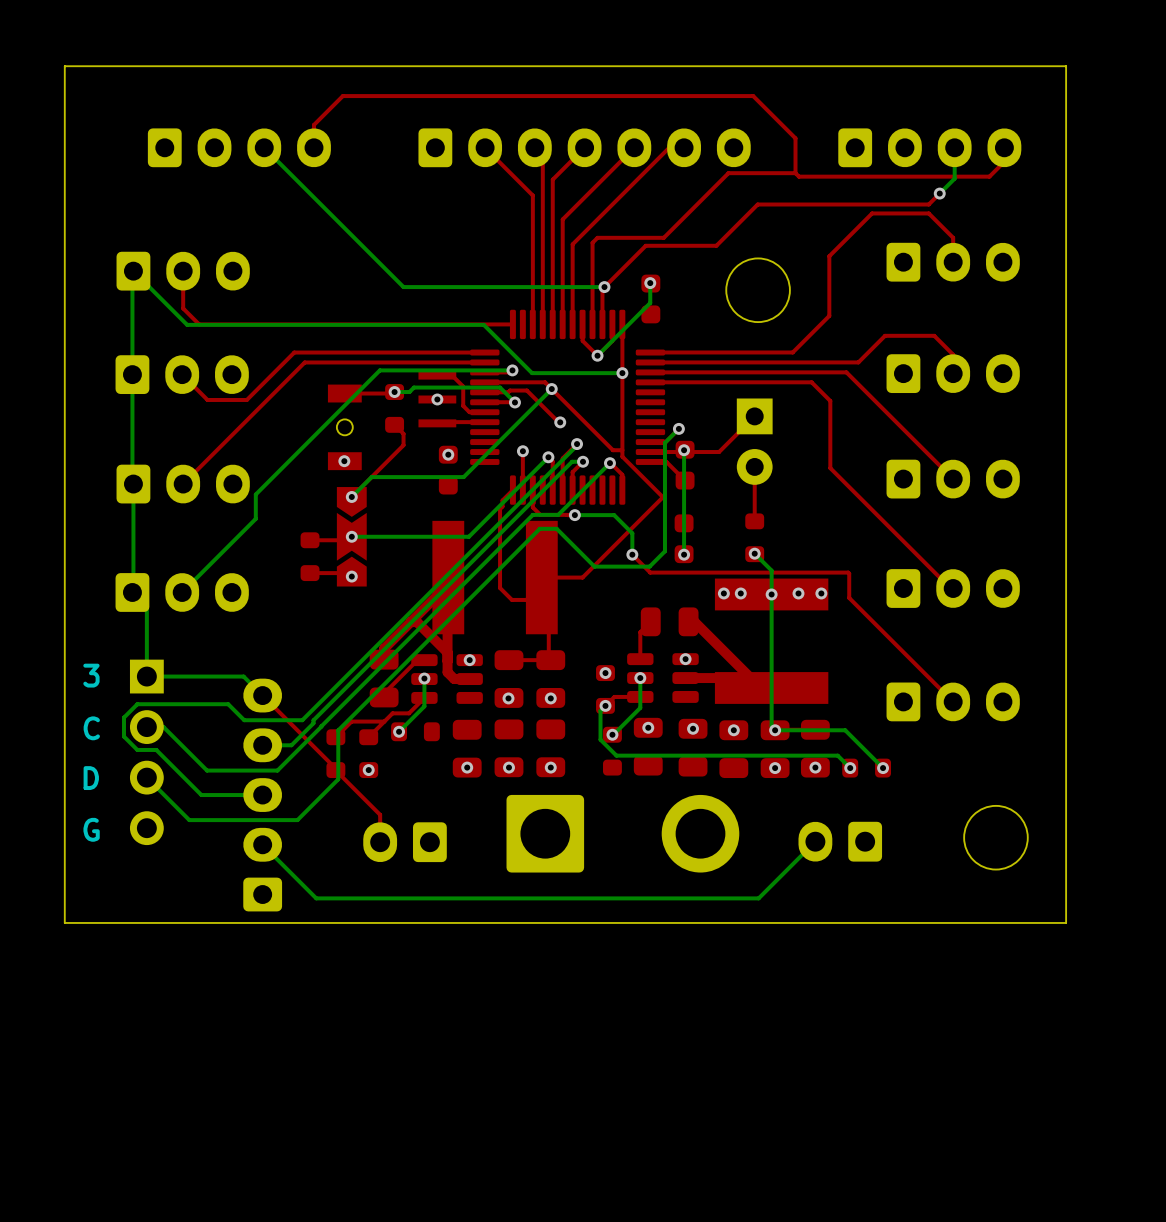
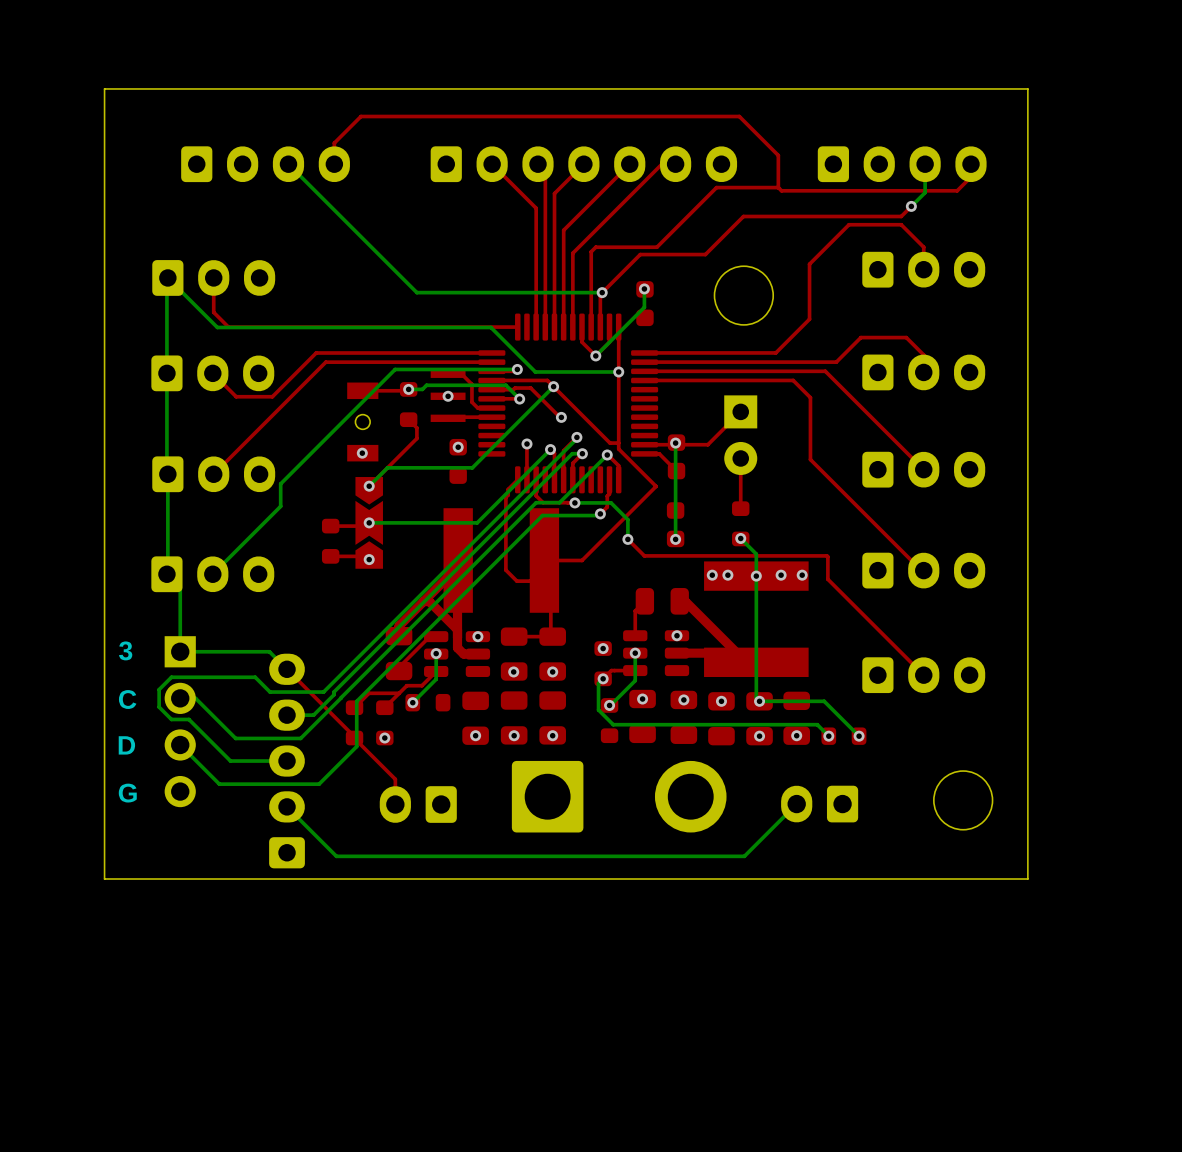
bottom track: (678, 428) (664, 442) (664, 551) (649, 566) (594, 566) (556, 528) -> (600, 513) (598, 515) (558, 515)
via: (678, 428) -> none
top track: none -> (609, 479) (607, 507) (600, 513)
via: none -> (600, 513)

